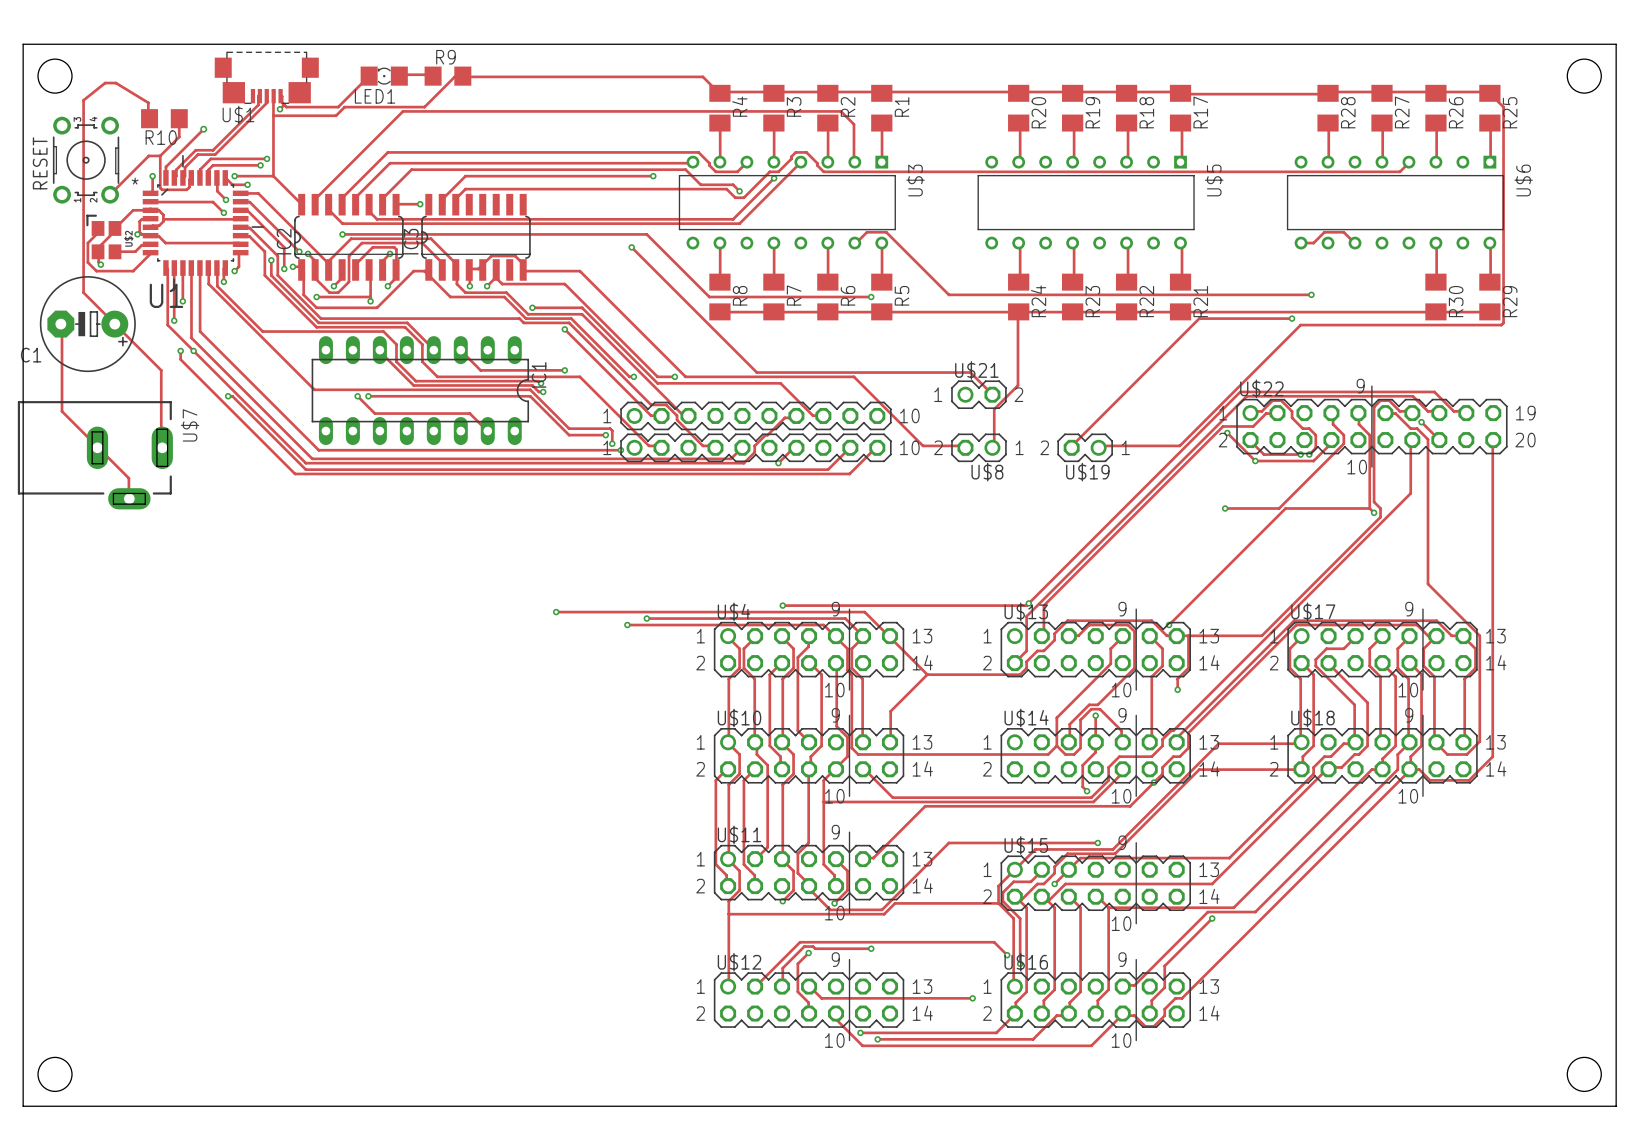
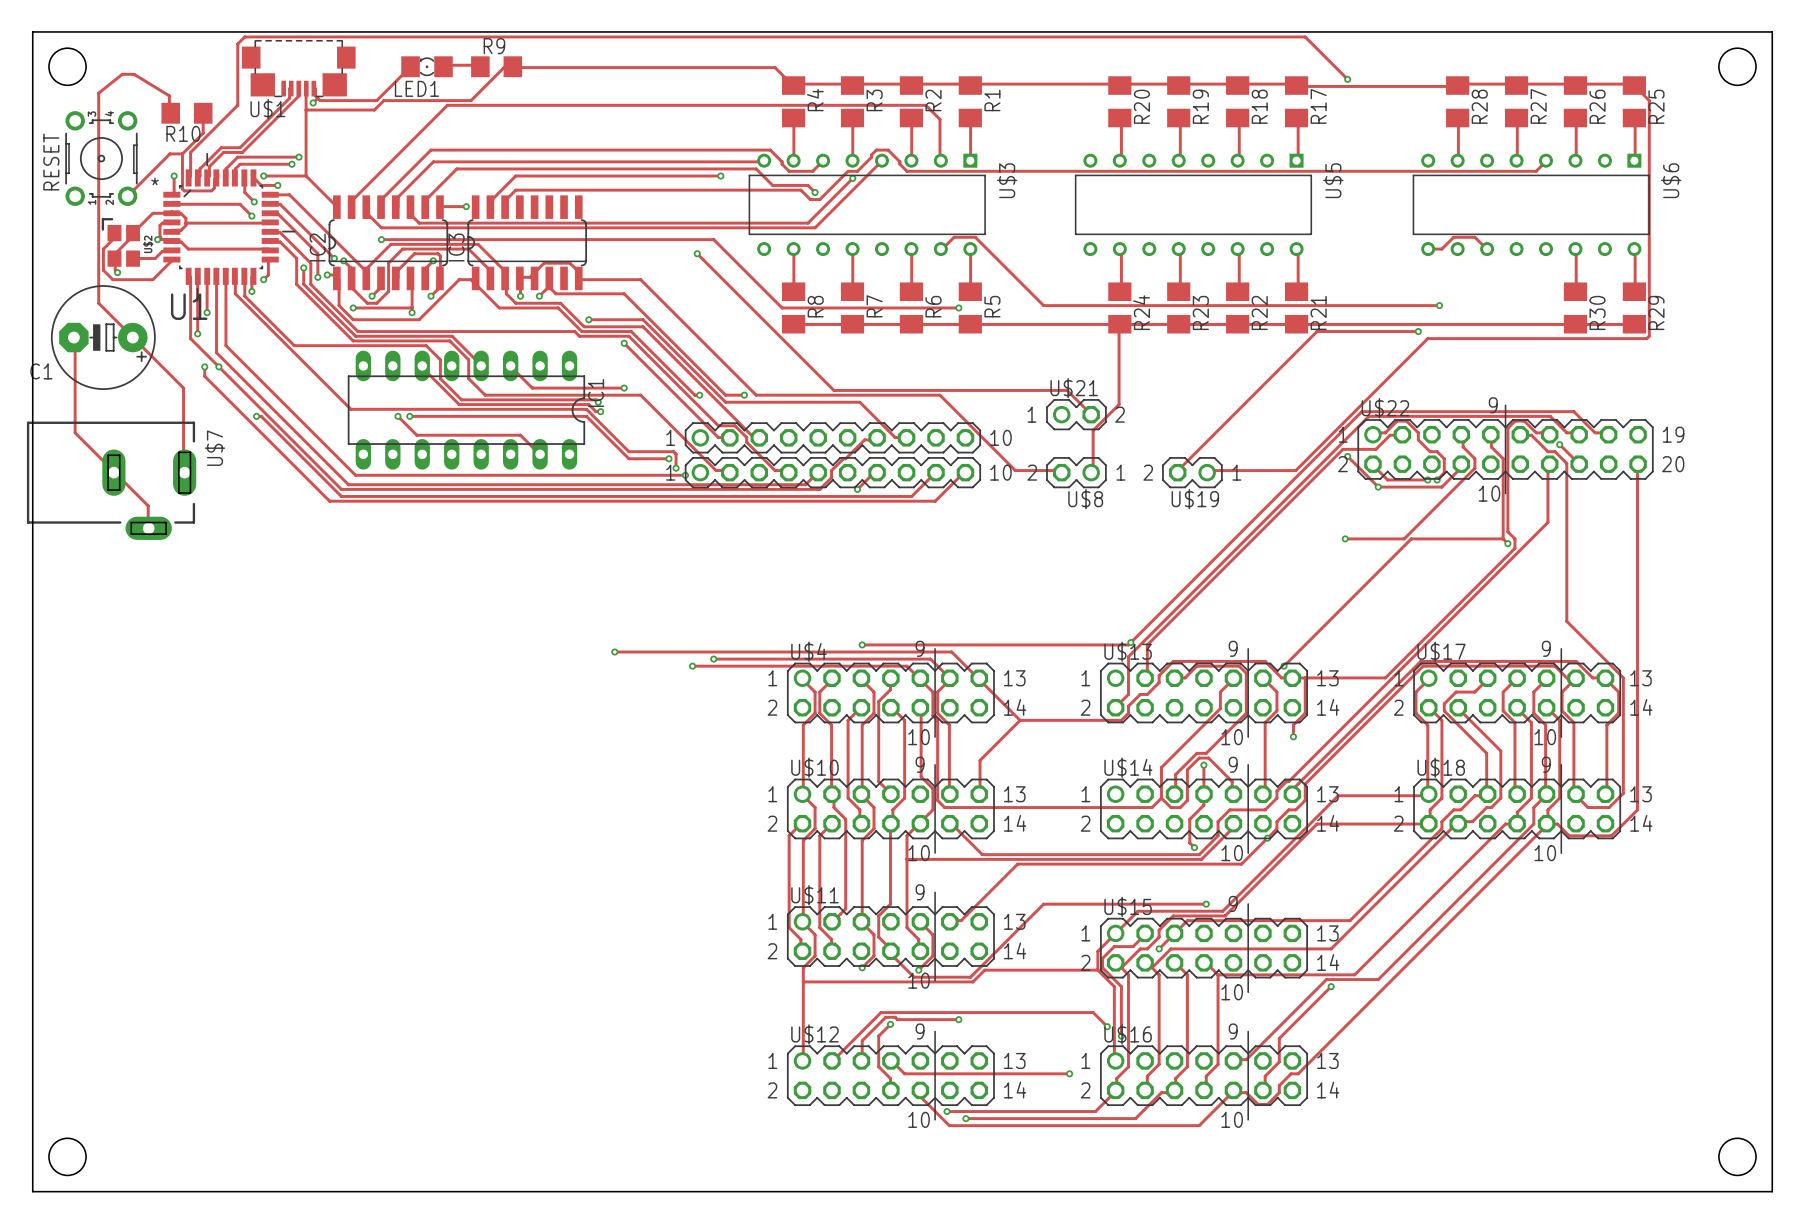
via: none -> (1347, 79)
track: (203, 129) (165, 166) (165, 177) -> (1347, 79) (1305, 36) (244, 36) (237, 44) (237, 105) (190, 152) (190, 176) (188, 177)
via: (203, 129) -> none

